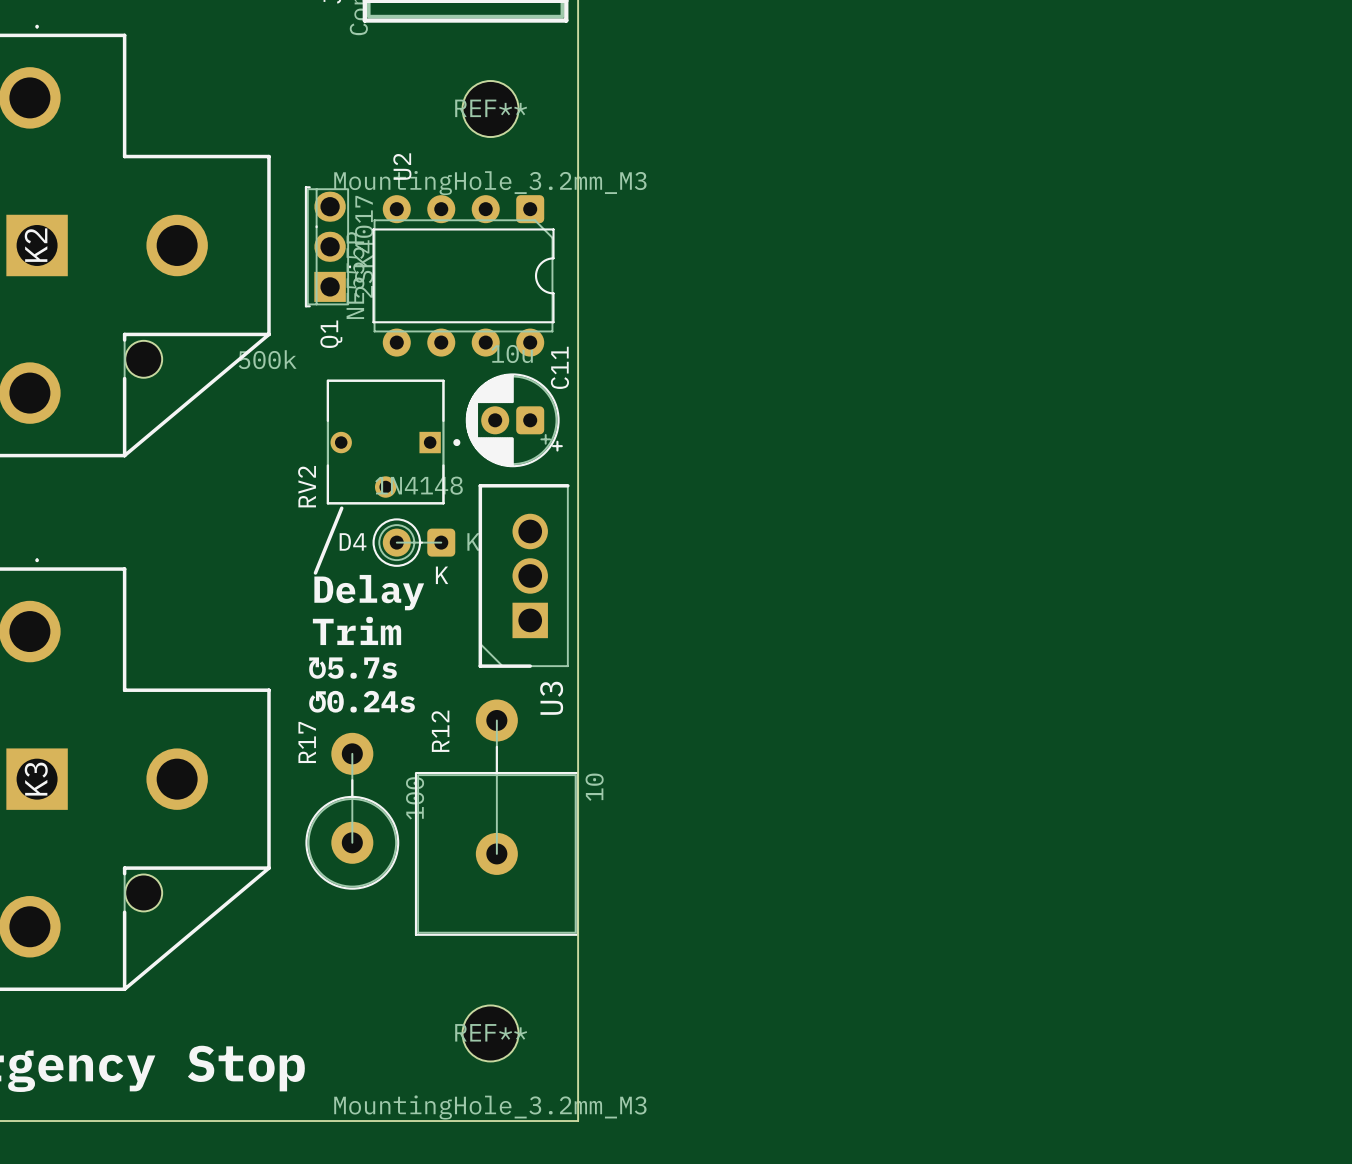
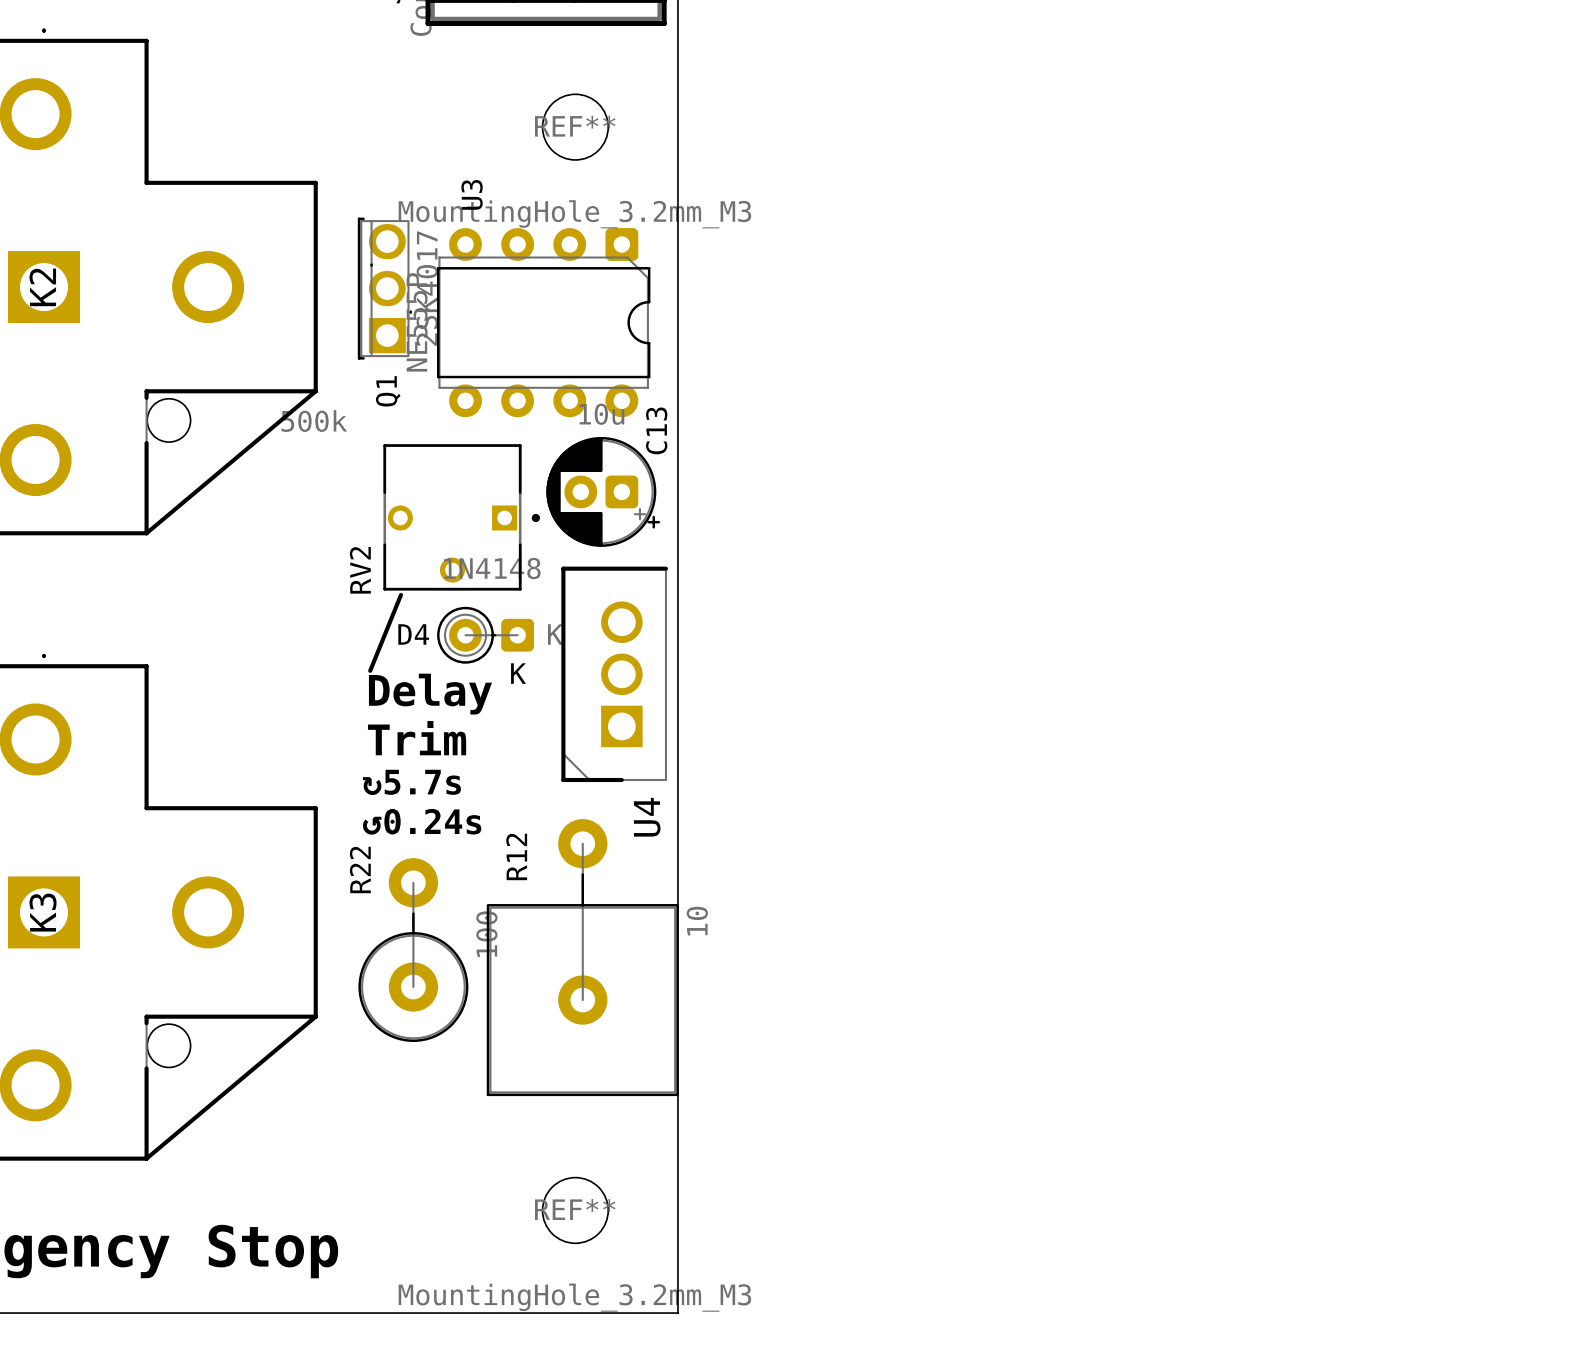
U2 name: U2 (402, 166) -> U3 (472, 194)
C11 name: C11 (559, 367) -> C13 (656, 430)
U3 name: U3 (551, 698) -> U4 (647, 817)
R17 name: R17 (307, 742) -> R22 (360, 869)

